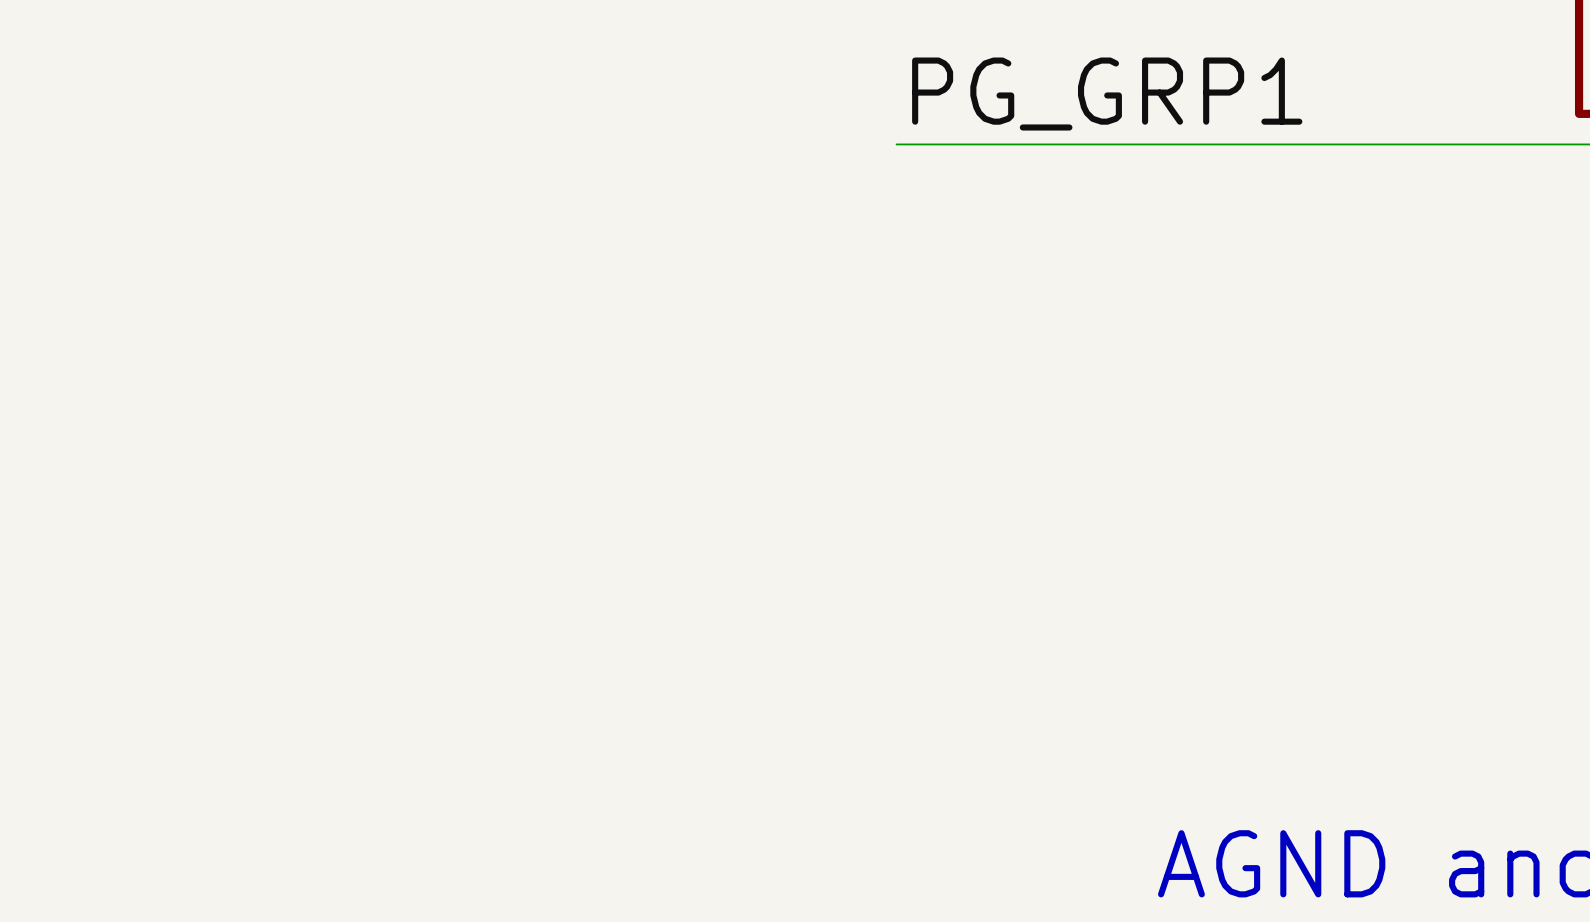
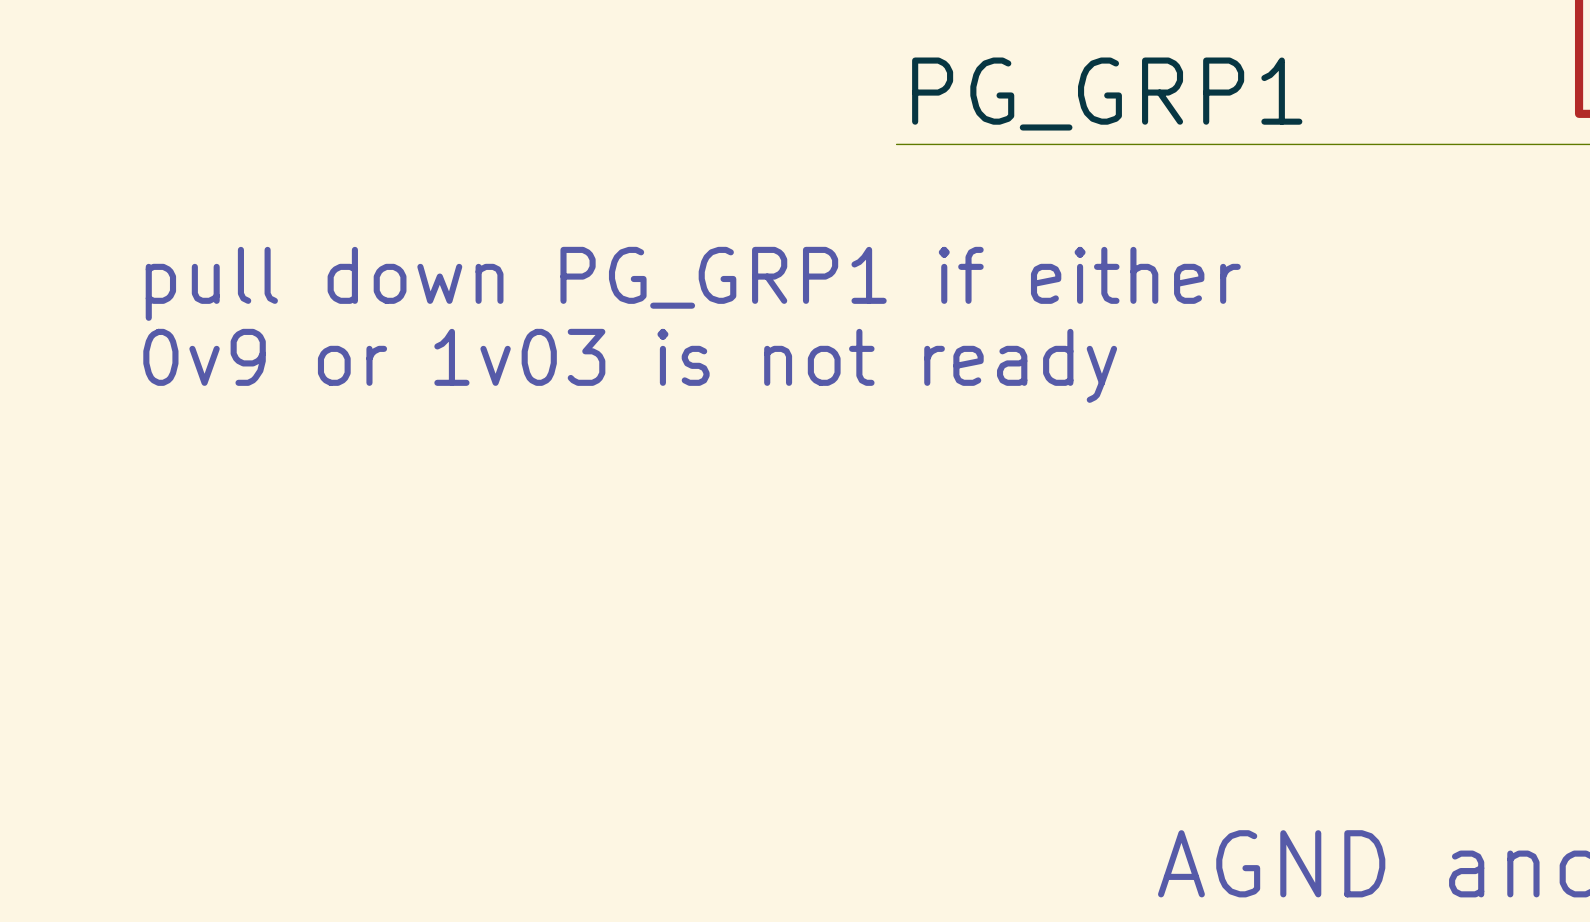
text: none -> pull down PG_GRP1 if either (693, 283)
text: none -> 0v9 or 1v03 is not ready (630, 365)

